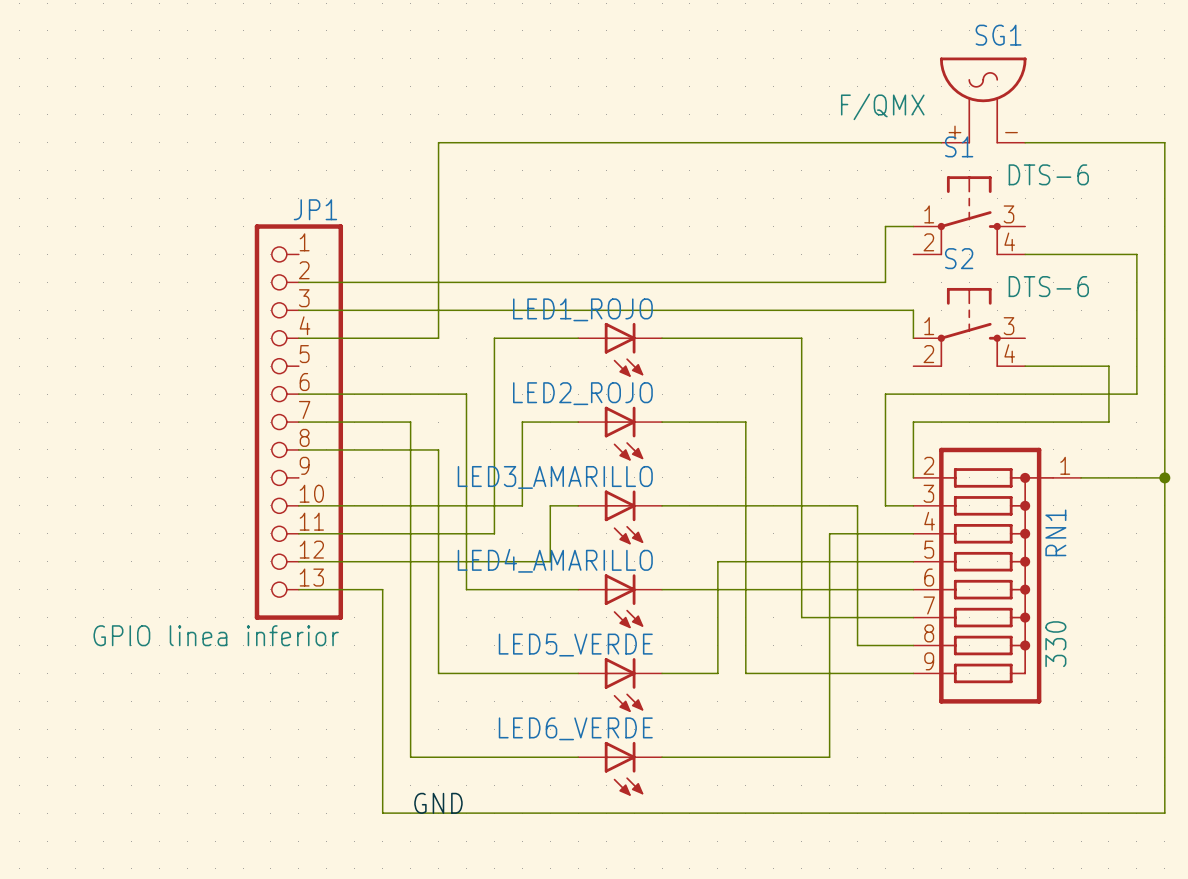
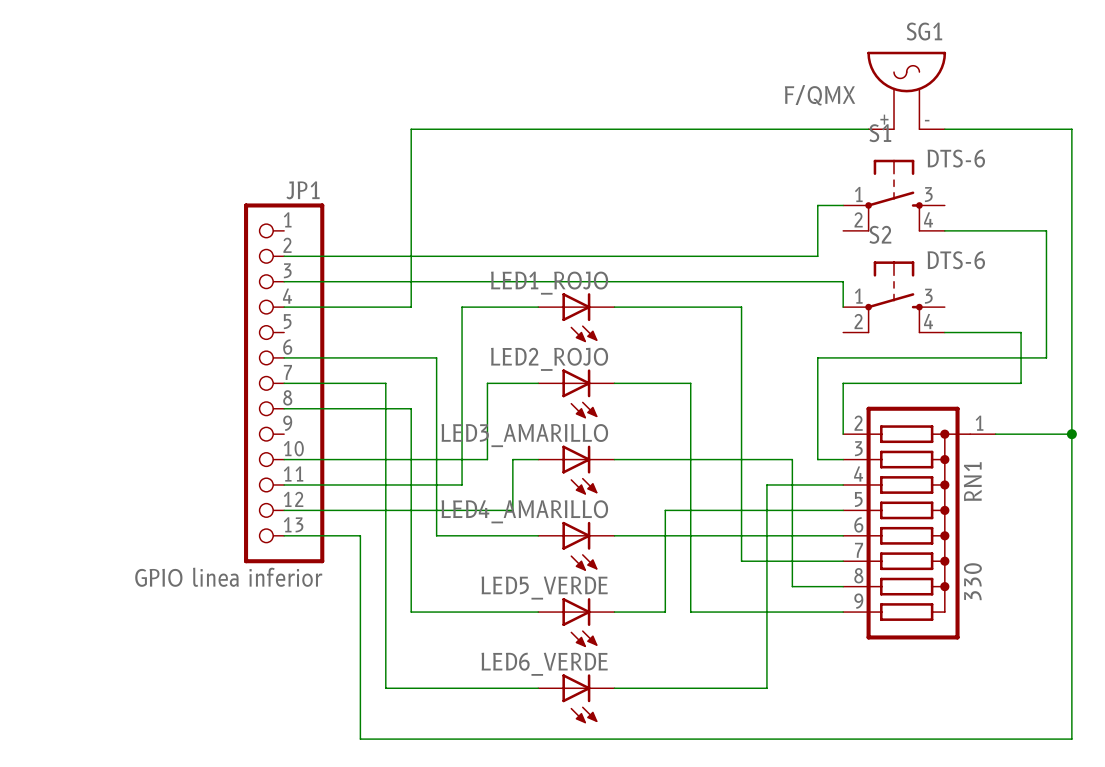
label: GND (438, 803) -> none

